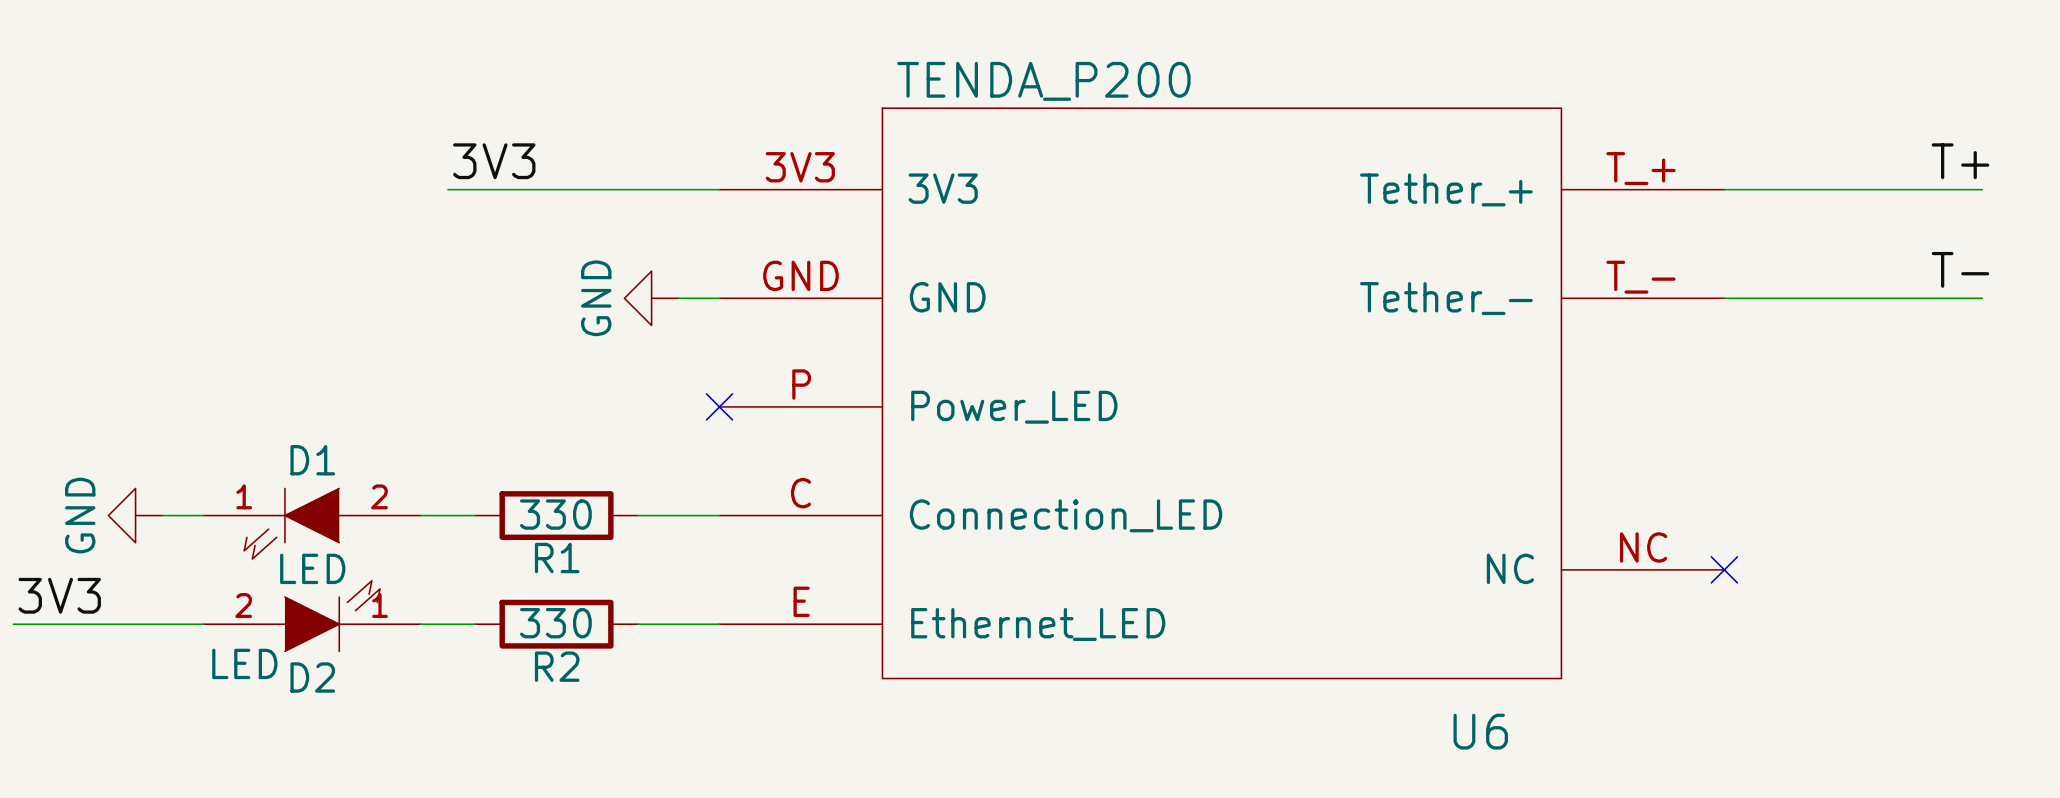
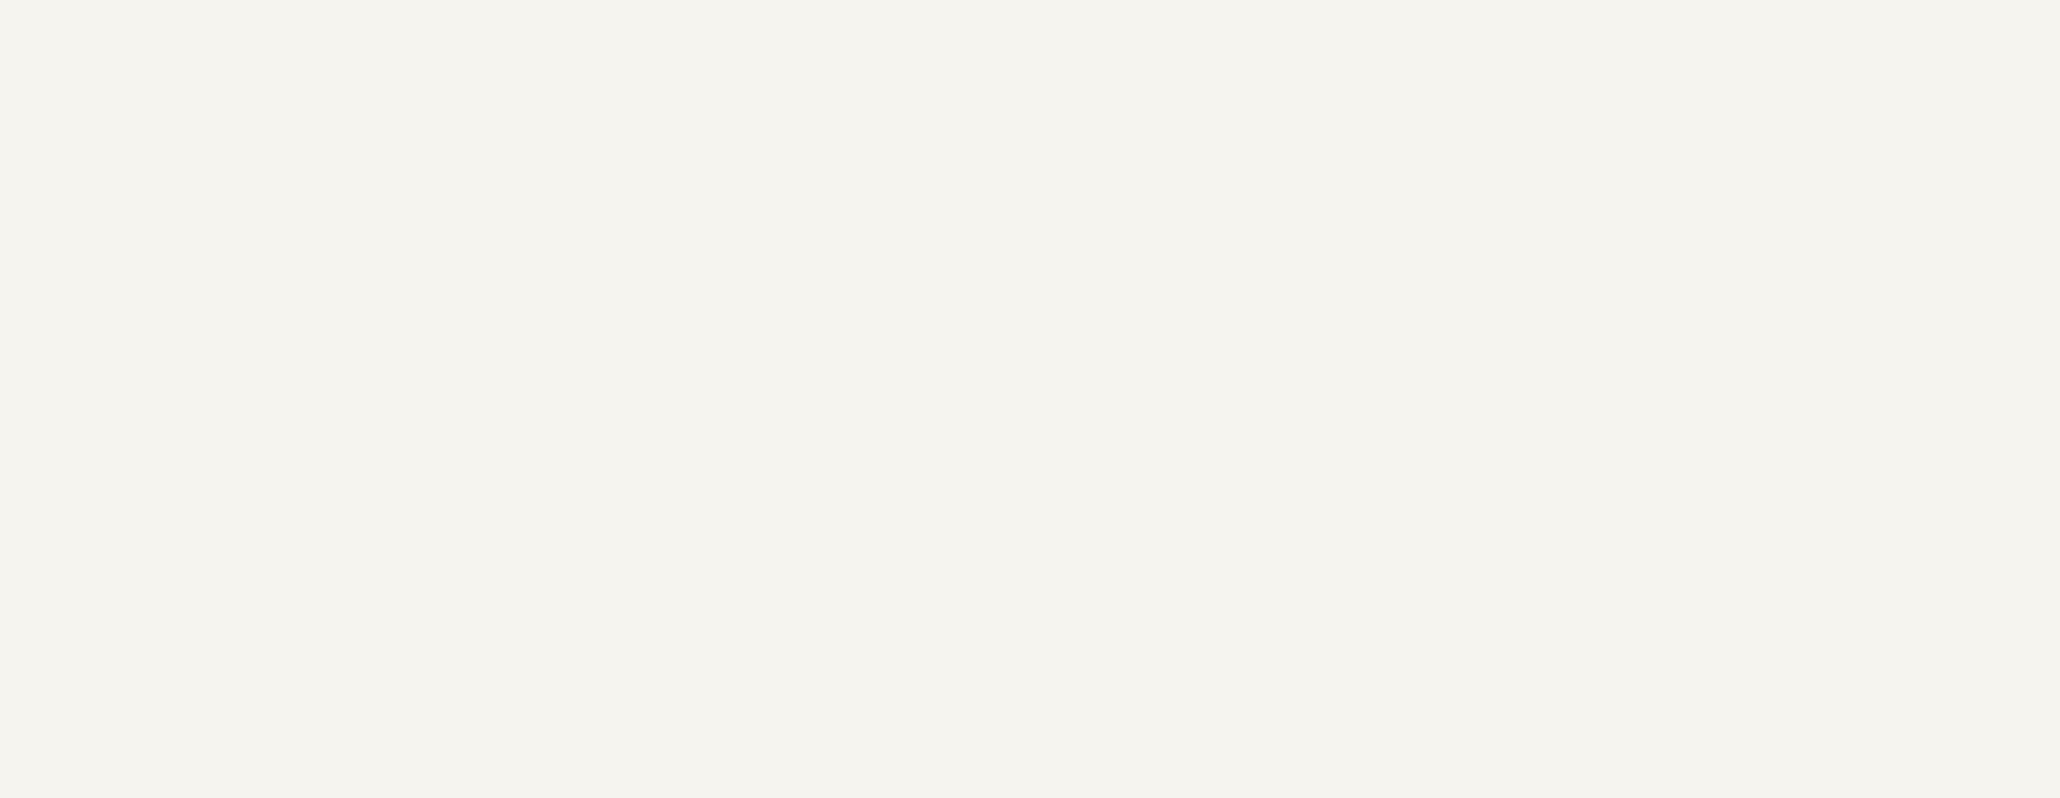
label: 3V3 (494, 161) -> none
label: T+ (1960, 161) -> none
wire: (447, 189) (719, 189) -> none
wire: (1724, 189) (1982, 189) -> none
label: T- (1960, 269) -> none
power symbol: GND (651, 298) -> none
wire: (678, 298) (719, 298) -> none
wire: (1724, 298) (1982, 298) -> none
U6: TENDA_P200 (1221, 393) -> none
no-connect mark: (719, 406) -> none
power symbol: GND (135, 515) -> none
wire: (162, 515) (203, 515) -> none
wire: (420, 515) (475, 515) -> none
R1: 330 (556, 515) -> none
wire: (638, 515) (719, 515) -> none
D1: LED (312, 523) -> none
no-connect mark: (1724, 569) -> none
label: 3V3 (59, 595) -> none
D2: LED (312, 616) -> none
wire: (13, 624) (203, 624) -> none
wire: (420, 624) (475, 624) -> none
R2: 330 (556, 624) -> none
wire: (638, 624) (719, 624) -> none

